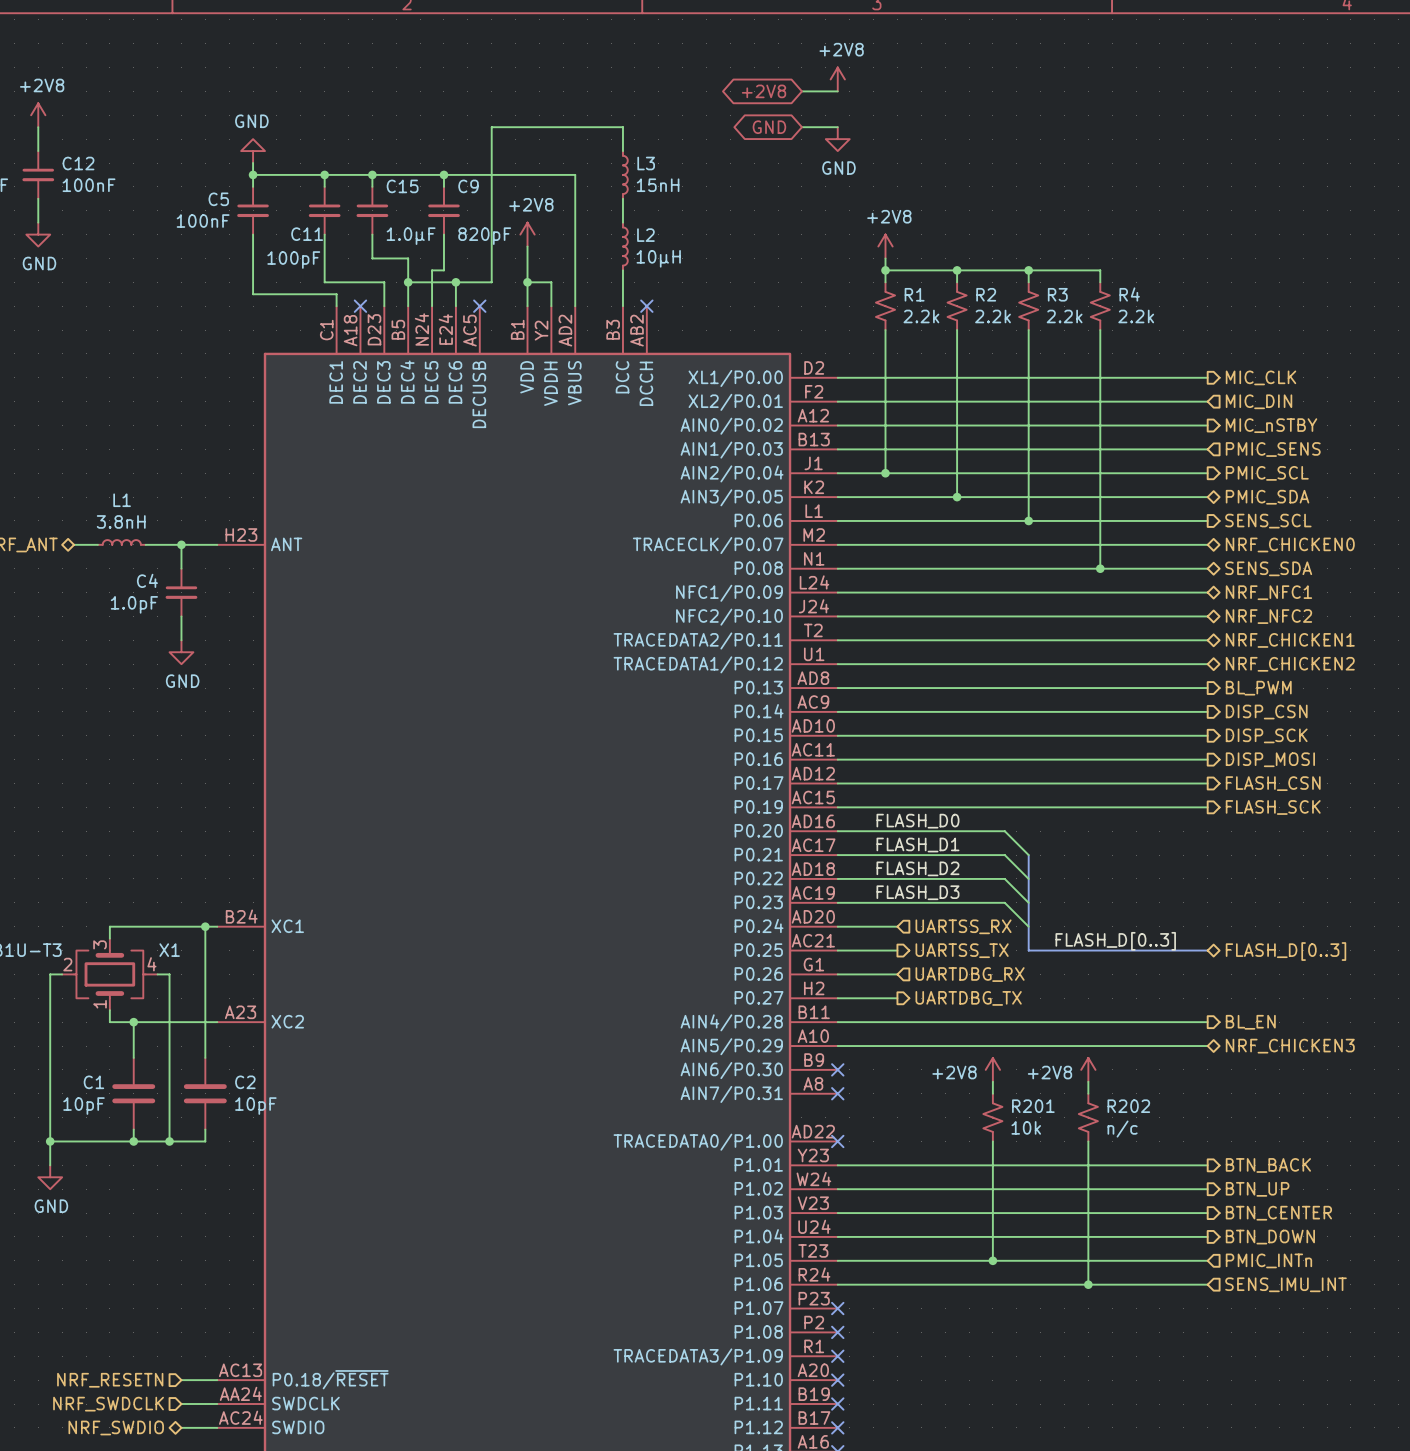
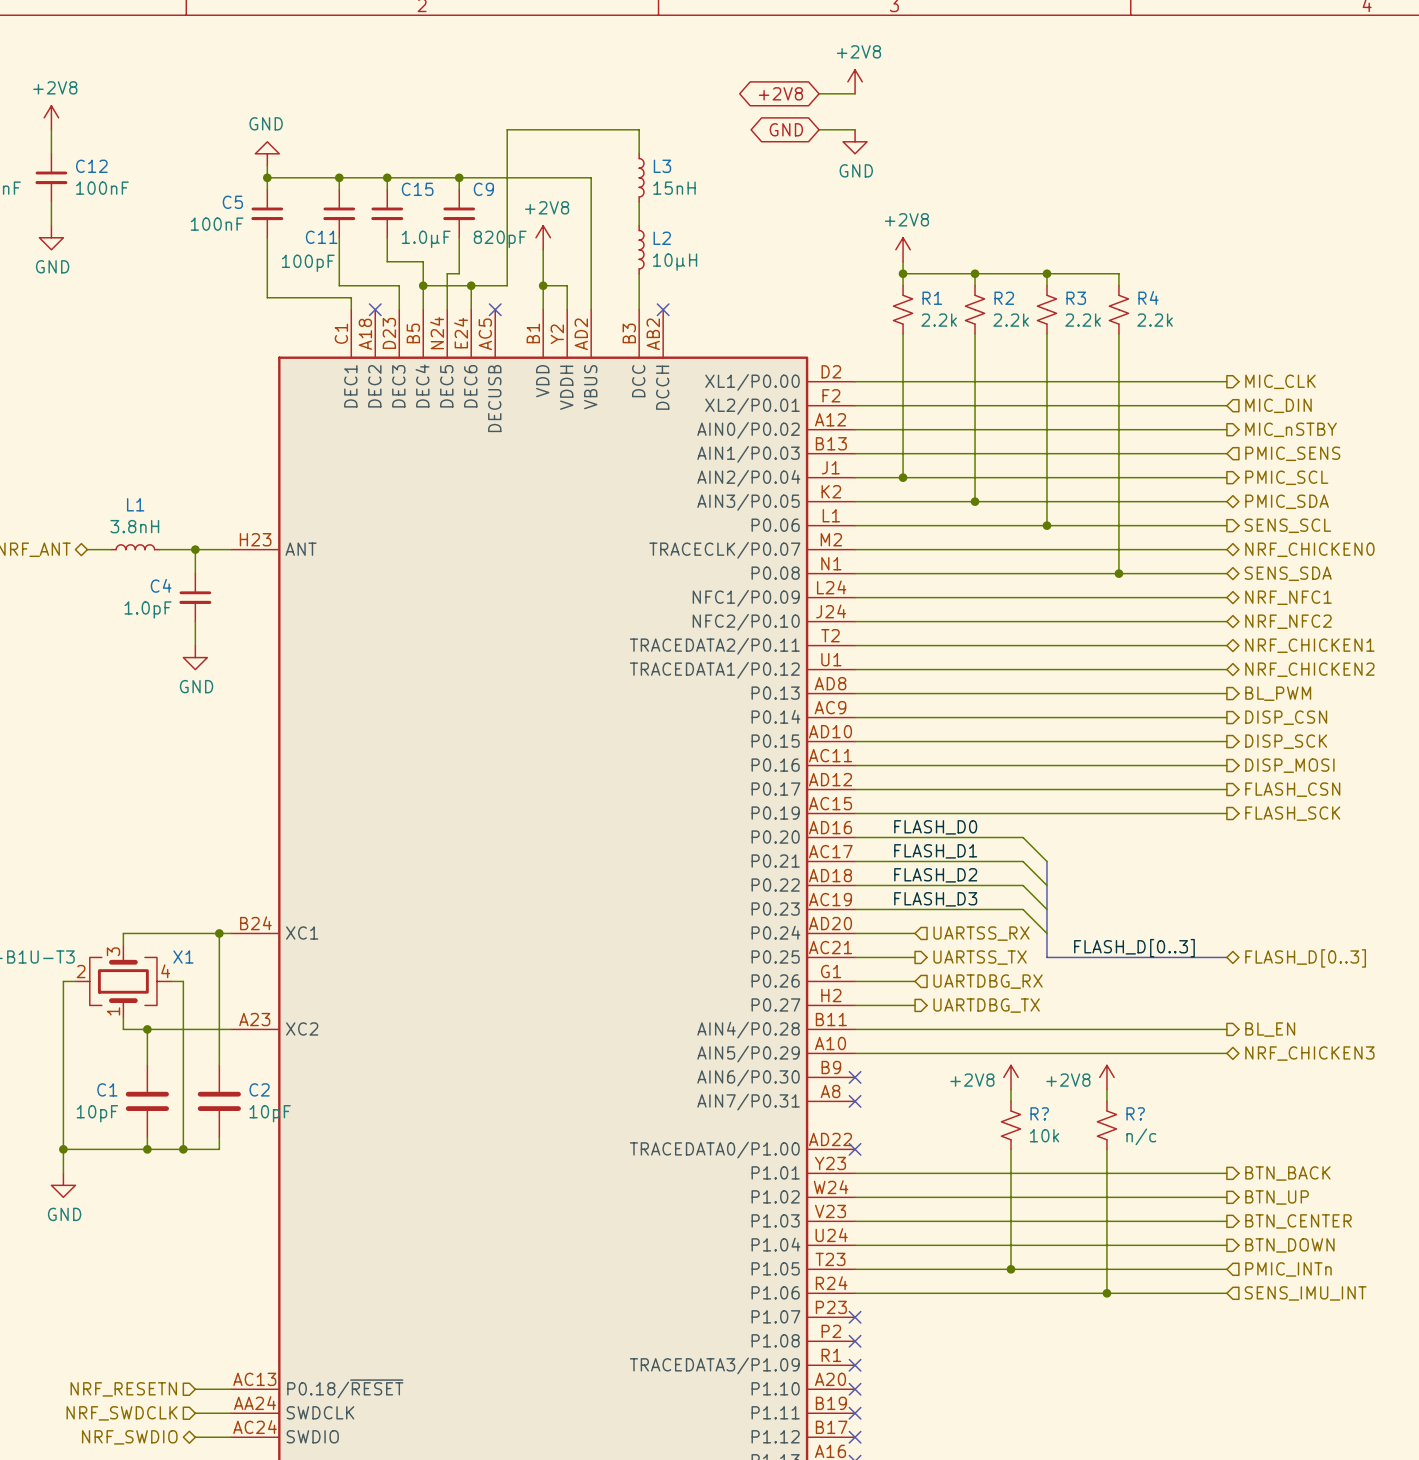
R201 name: R201 (1033, 1106) -> R? (1039, 1113)
R202 name: R202 (1128, 1106) -> R? (1135, 1113)

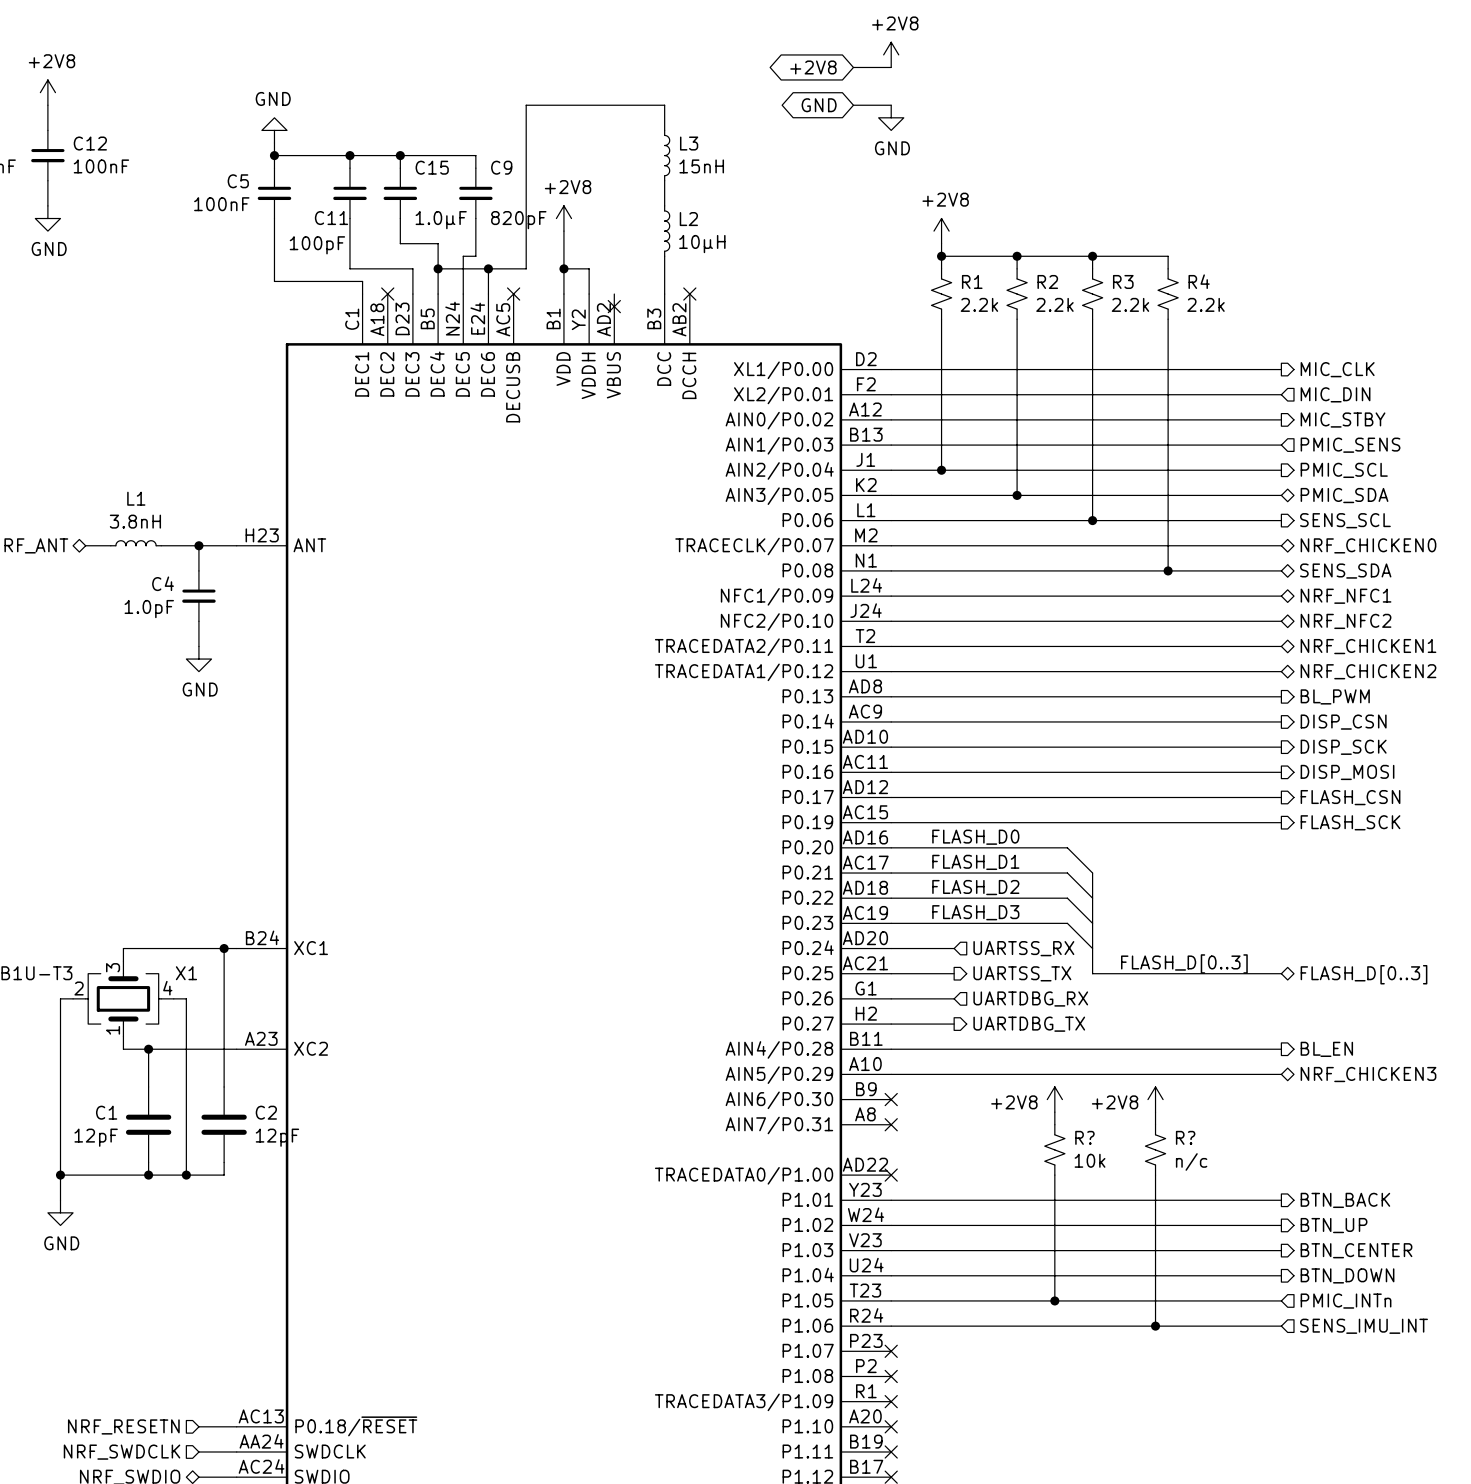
wire: (459, 177) (591, 177) (591, 309) -> none
junction: (459, 177) -> none
no-connect mark: none -> (614, 306)
hierarchical label: MIC_nSTBY (1291, 429) -> MIC_STBY (1343, 420)
C1 value: 10pF (97, 1113) -> 12pF (96, 1137)
C2 value: 10pF (270, 1113) -> 12pF (277, 1137)

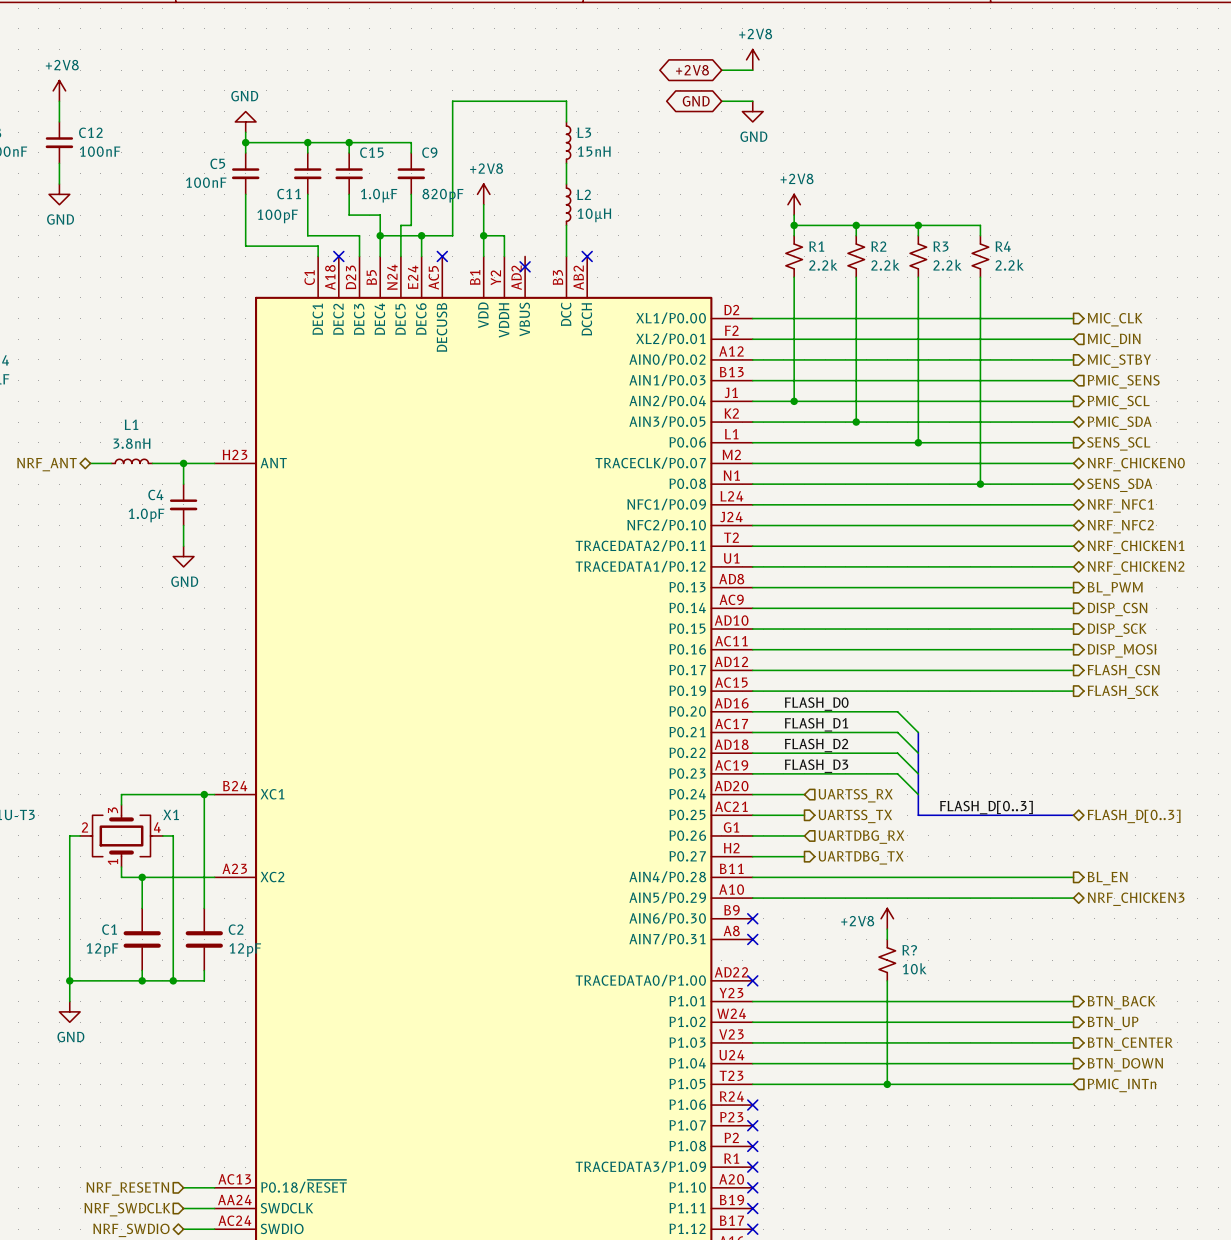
power symbol: +2V8 (1155, 1099) -> none
wire: (1155, 1112) (1155, 1124) -> none
R?: n/c (1155, 1149) -> none
wire: (1155, 1175) (1155, 1326) -> none
wire: (891, 1326) (1281, 1326) -> none
no-connect mark: none -> (752, 1105)
junction: (1155, 1326) -> none
hierarchical label: SENS_IMU_INT (1364, 1326) -> none

